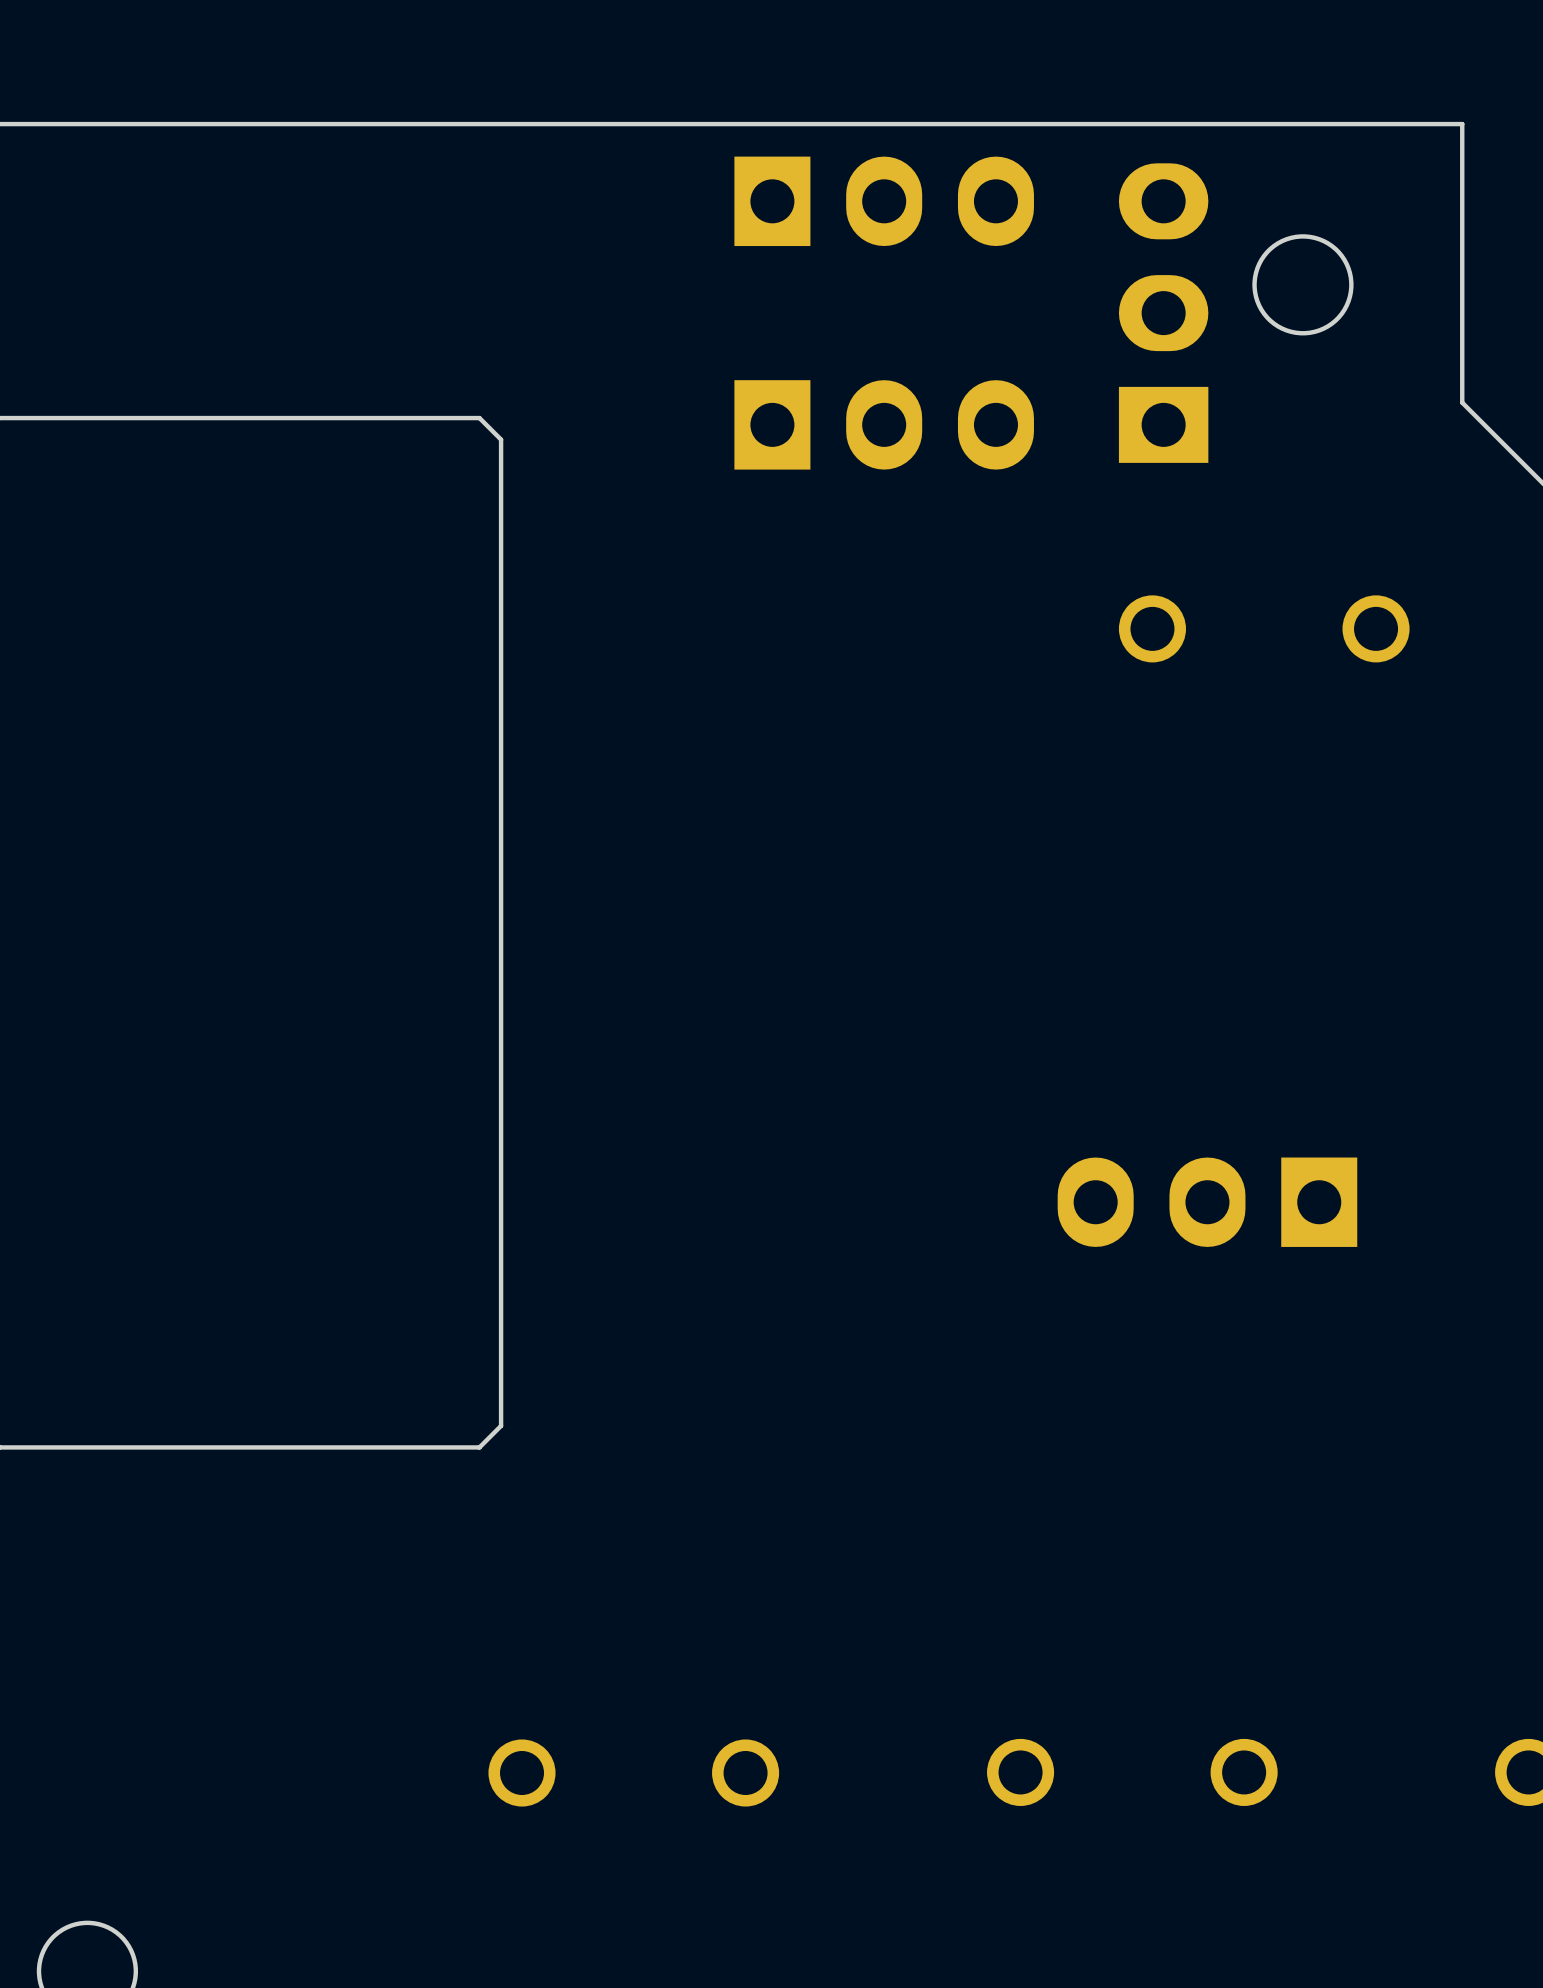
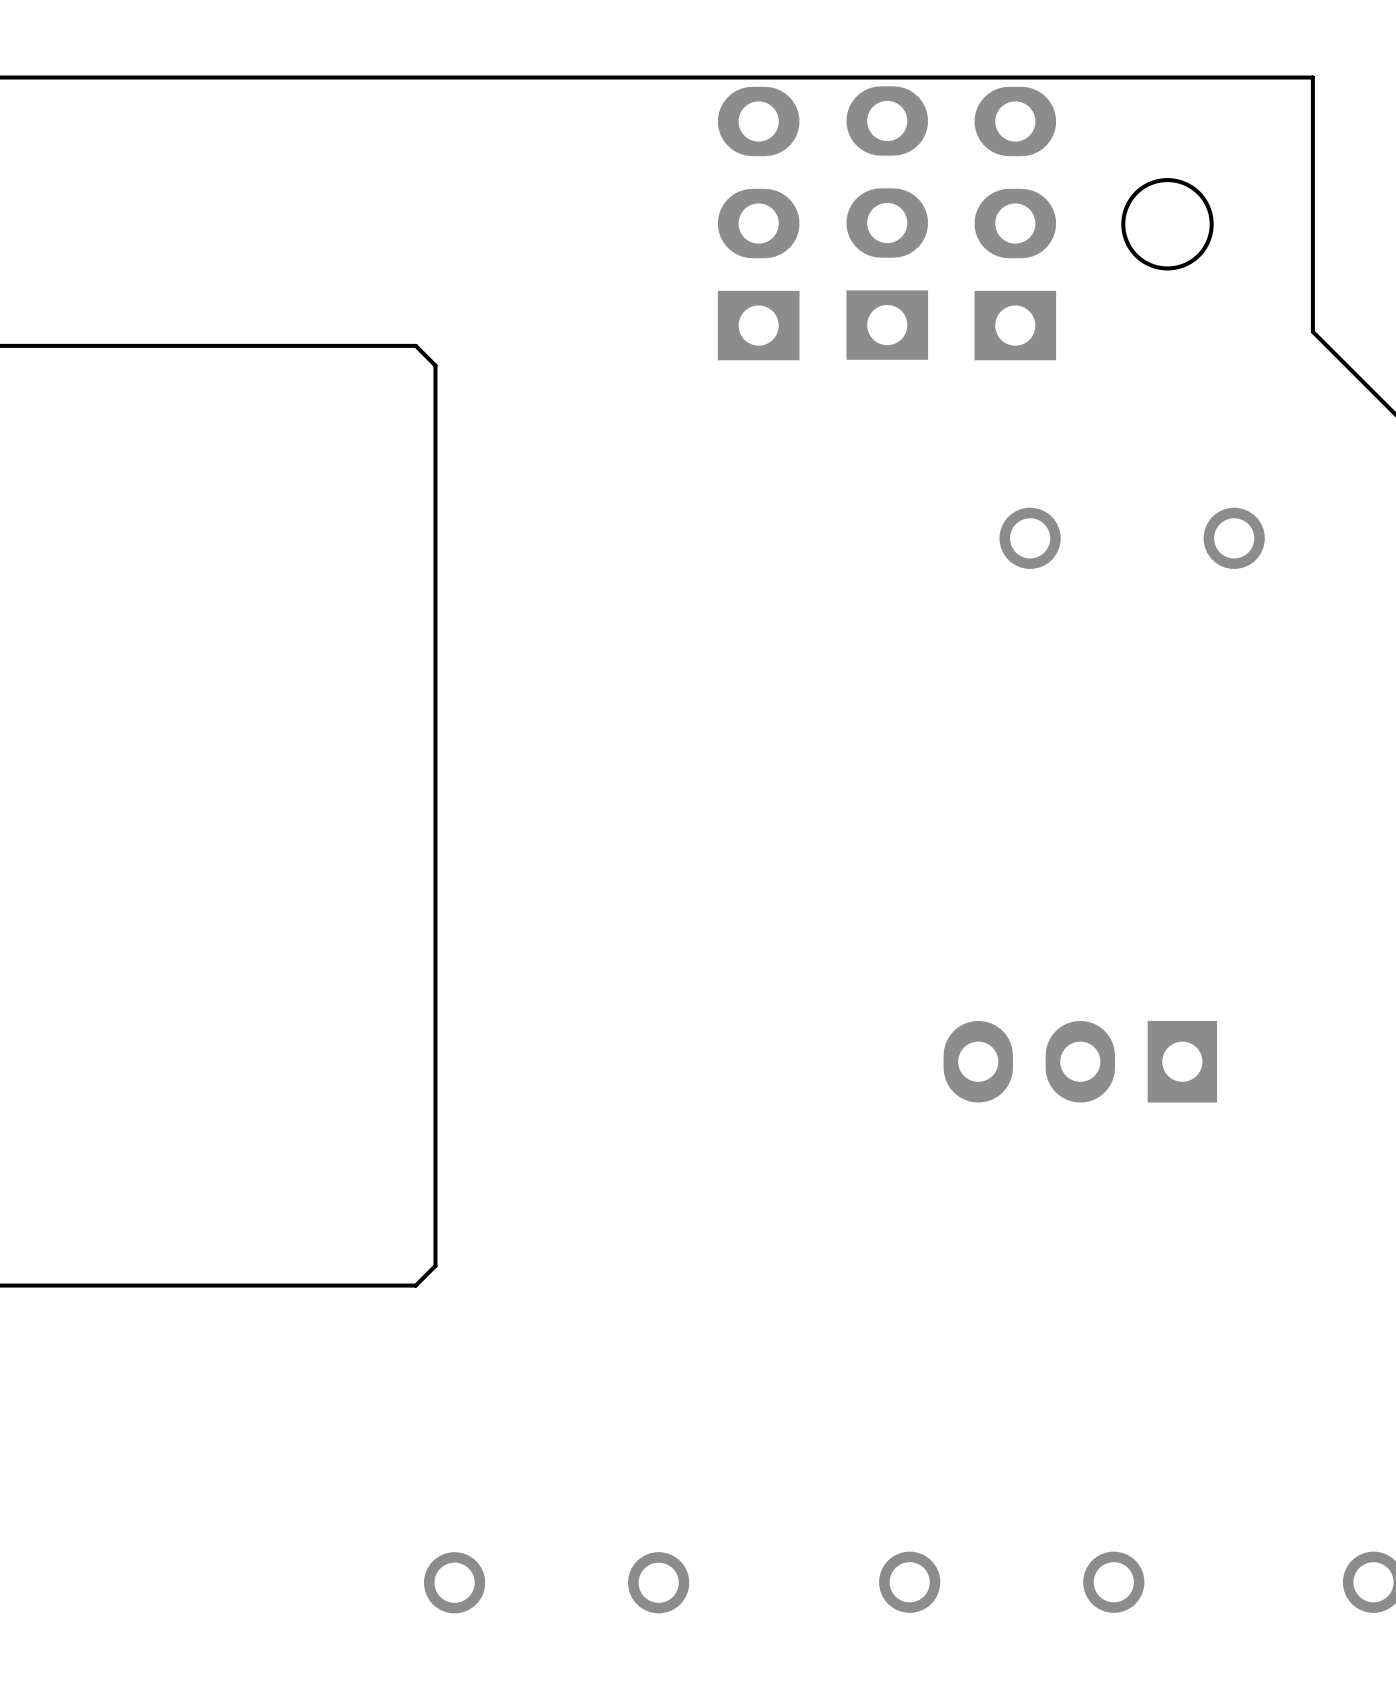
part: (884, 201) -> none
part: none -> (887, 223)
part: none -> (758, 223)
part position: (1163, 313) -> (1015, 223)
part: (884, 424) -> none

